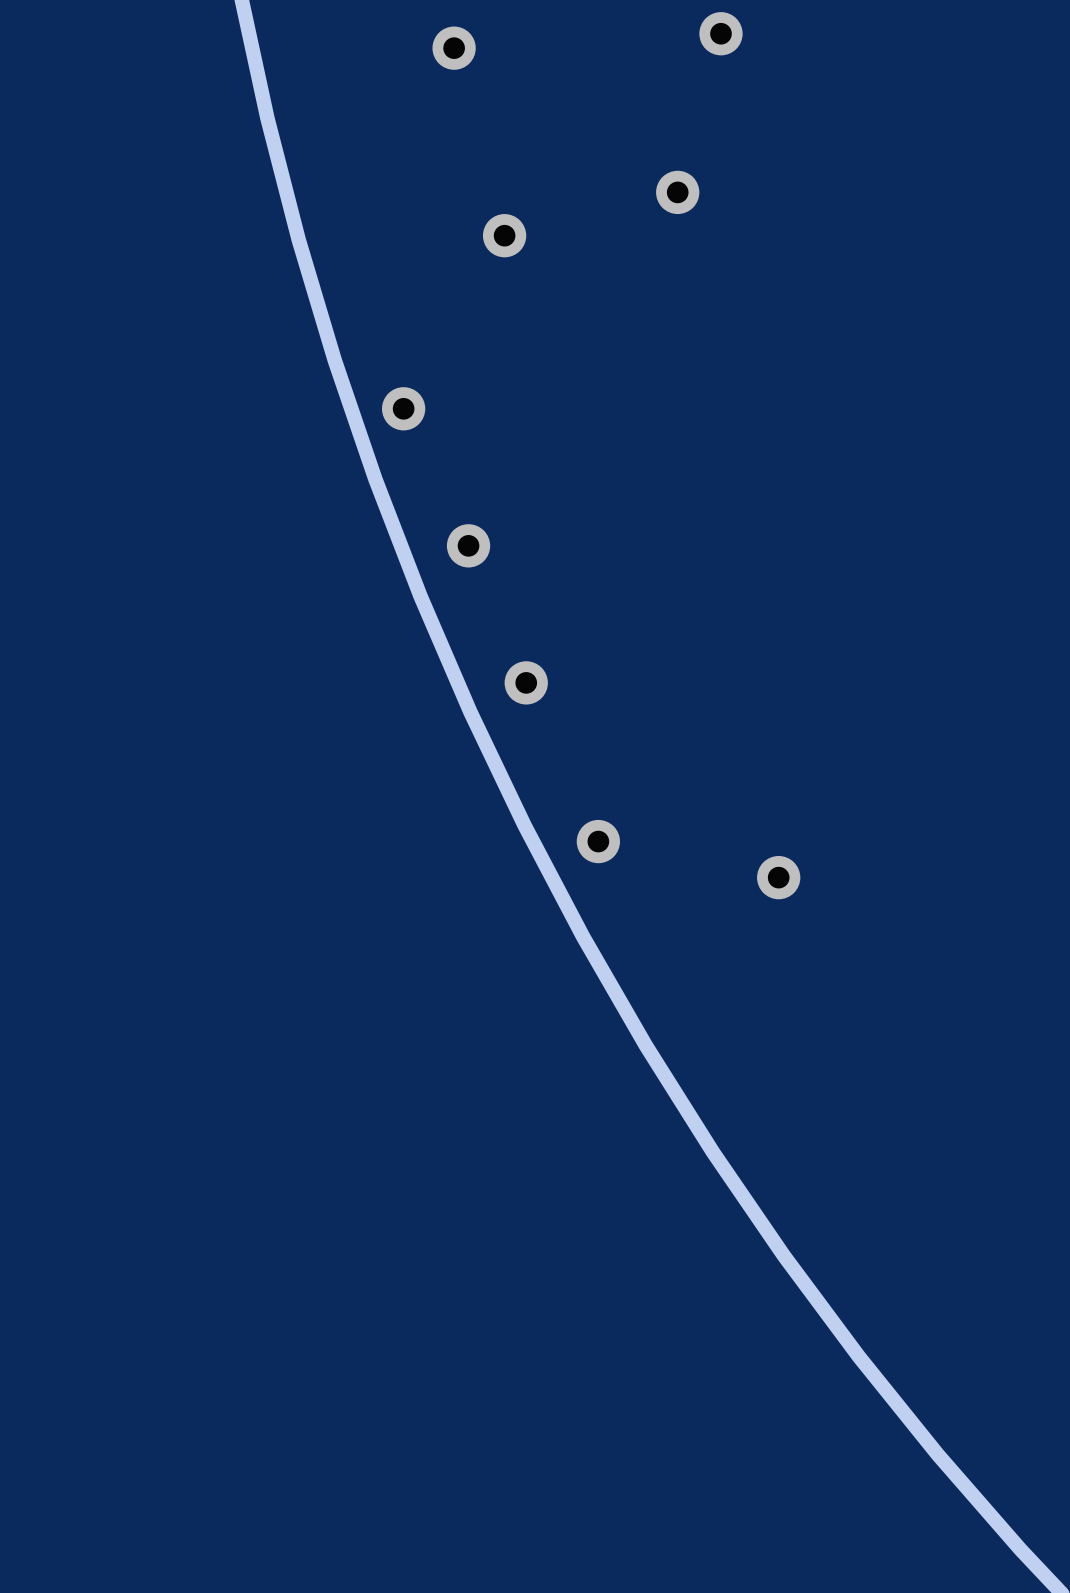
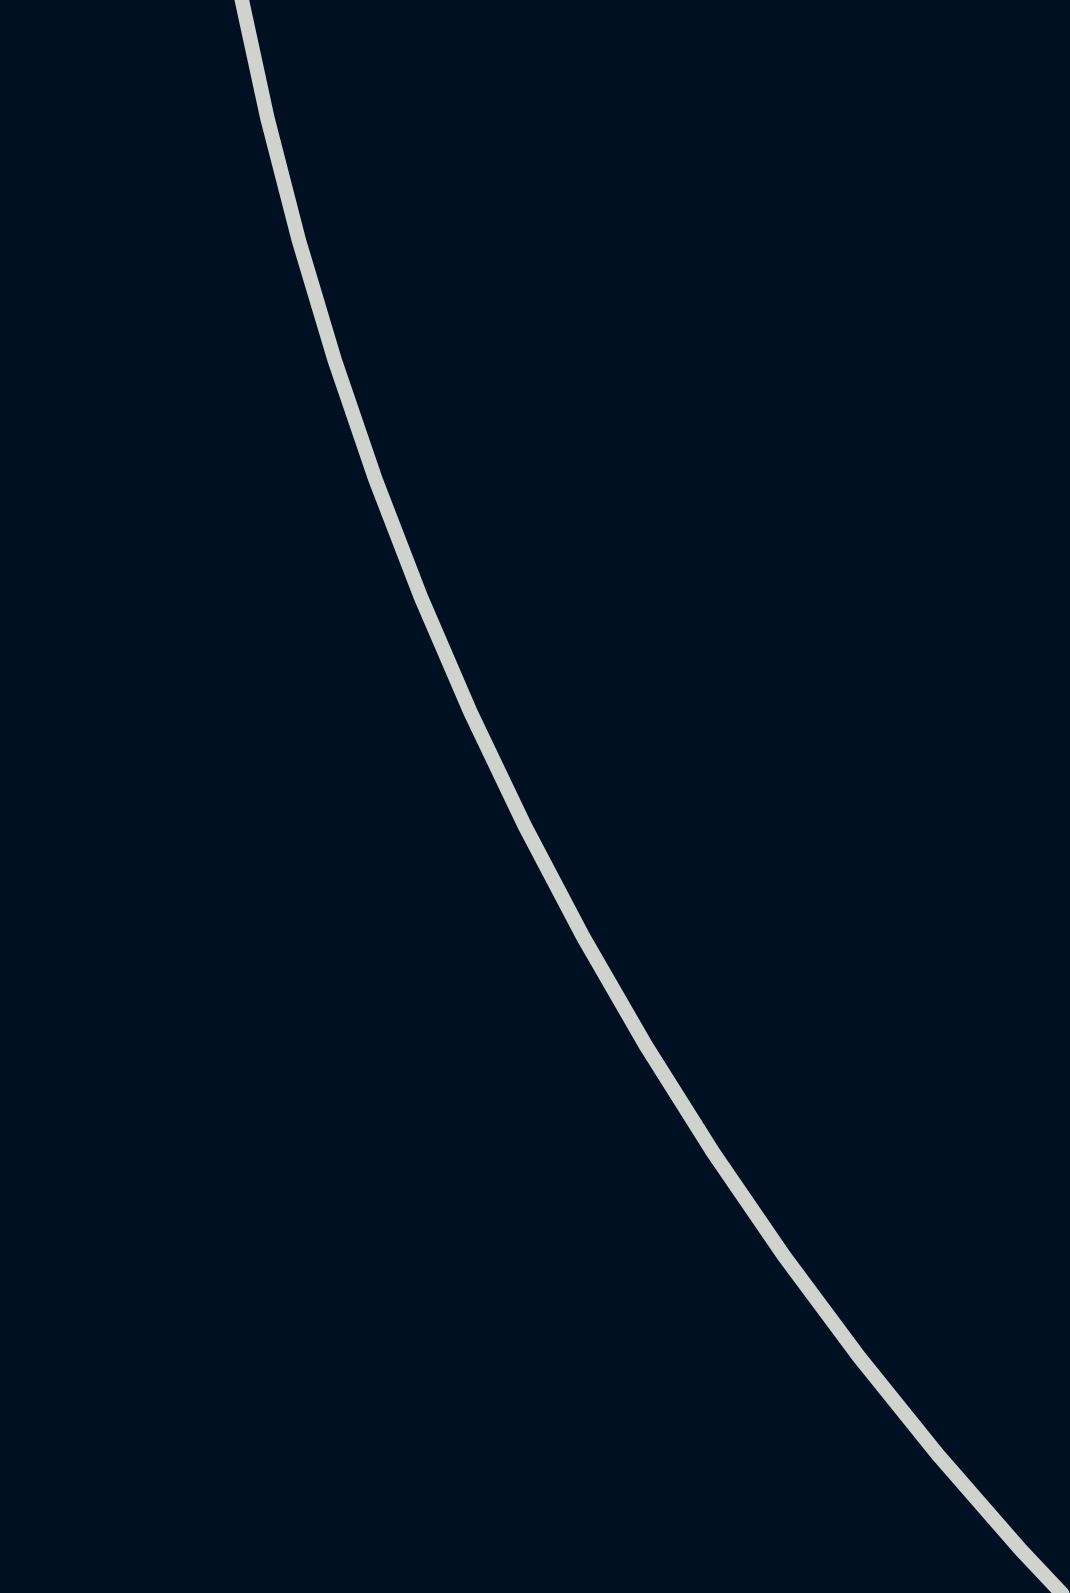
via: (720, 33) -> none
via: (454, 48) -> none
via: (677, 192) -> none
via: (504, 235) -> none
via: (403, 408) -> none
via: (468, 545) -> none
via: (526, 682) -> none
via: (598, 841) -> none
via: (778, 877) -> none

